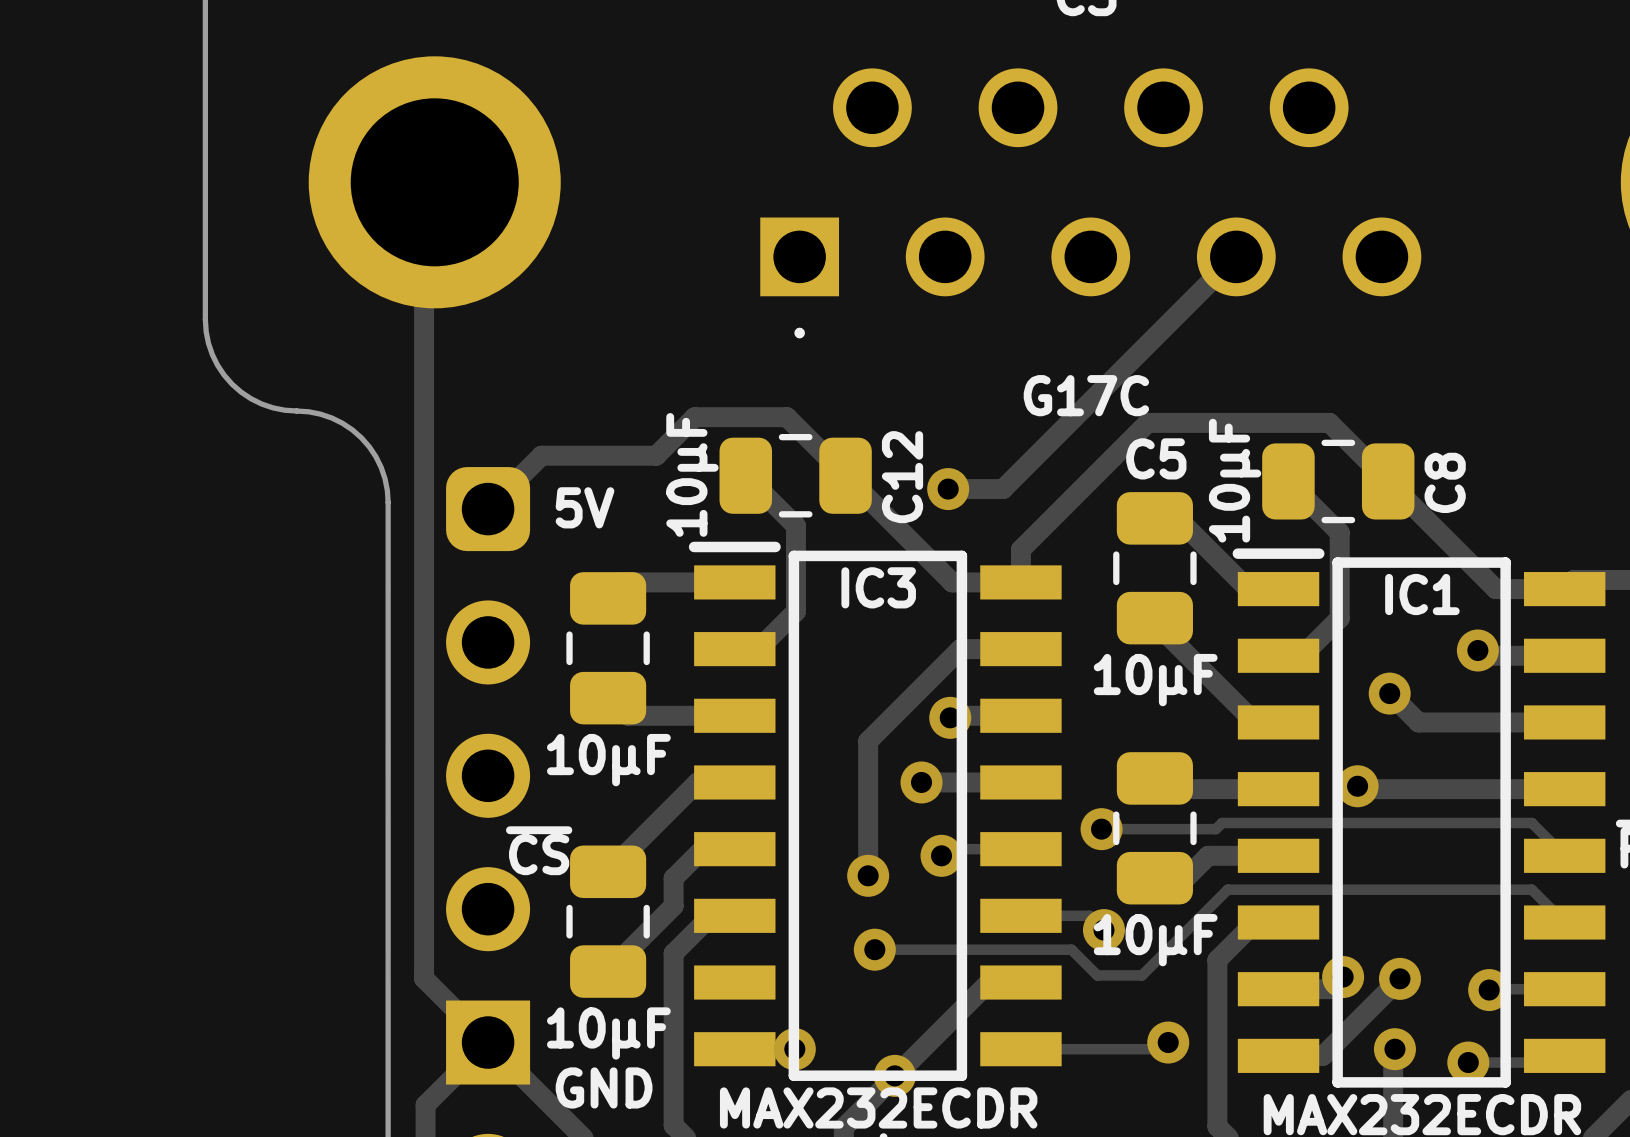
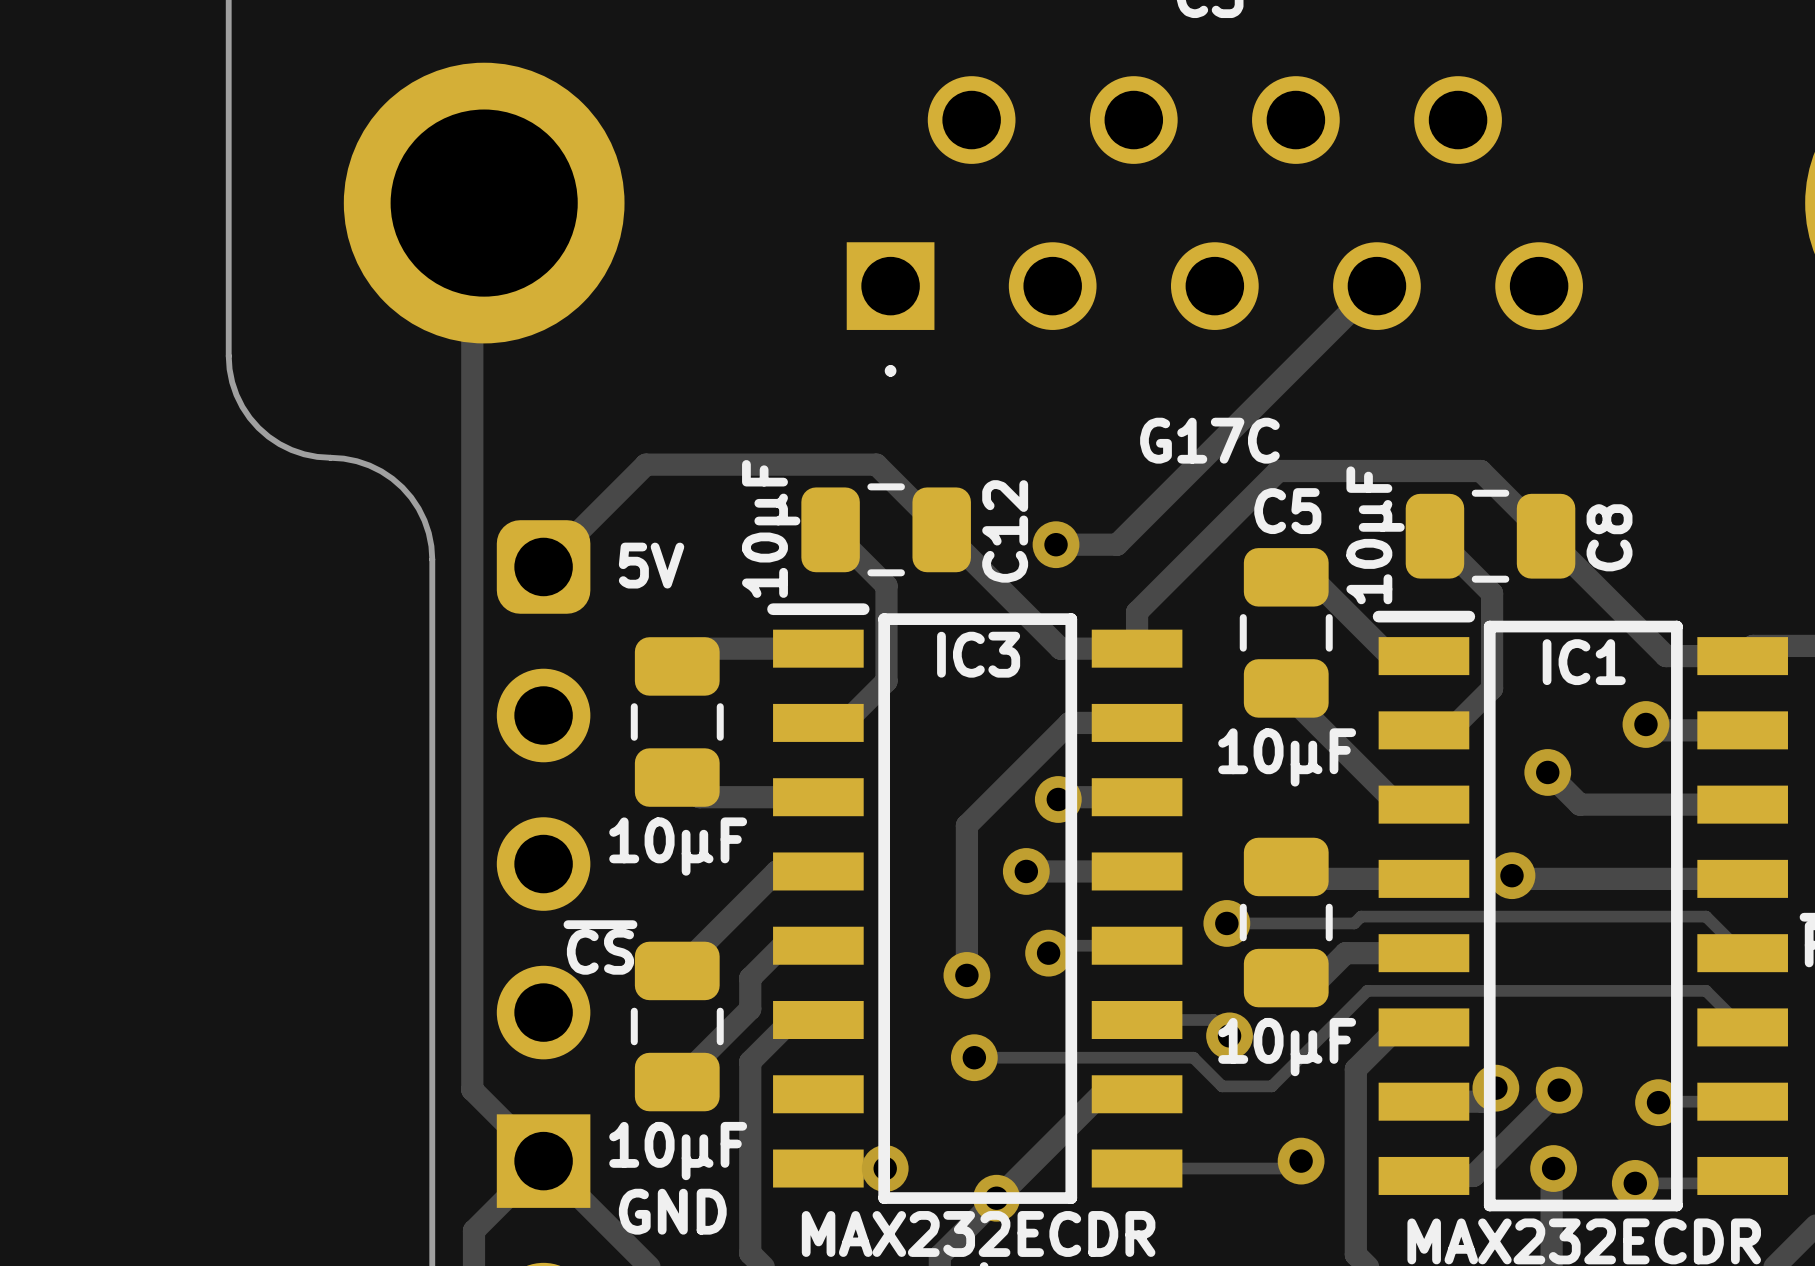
track: (694, 417) (656, 455) (541, 455) -> (773, 464) (645, 464) (603, 507)

